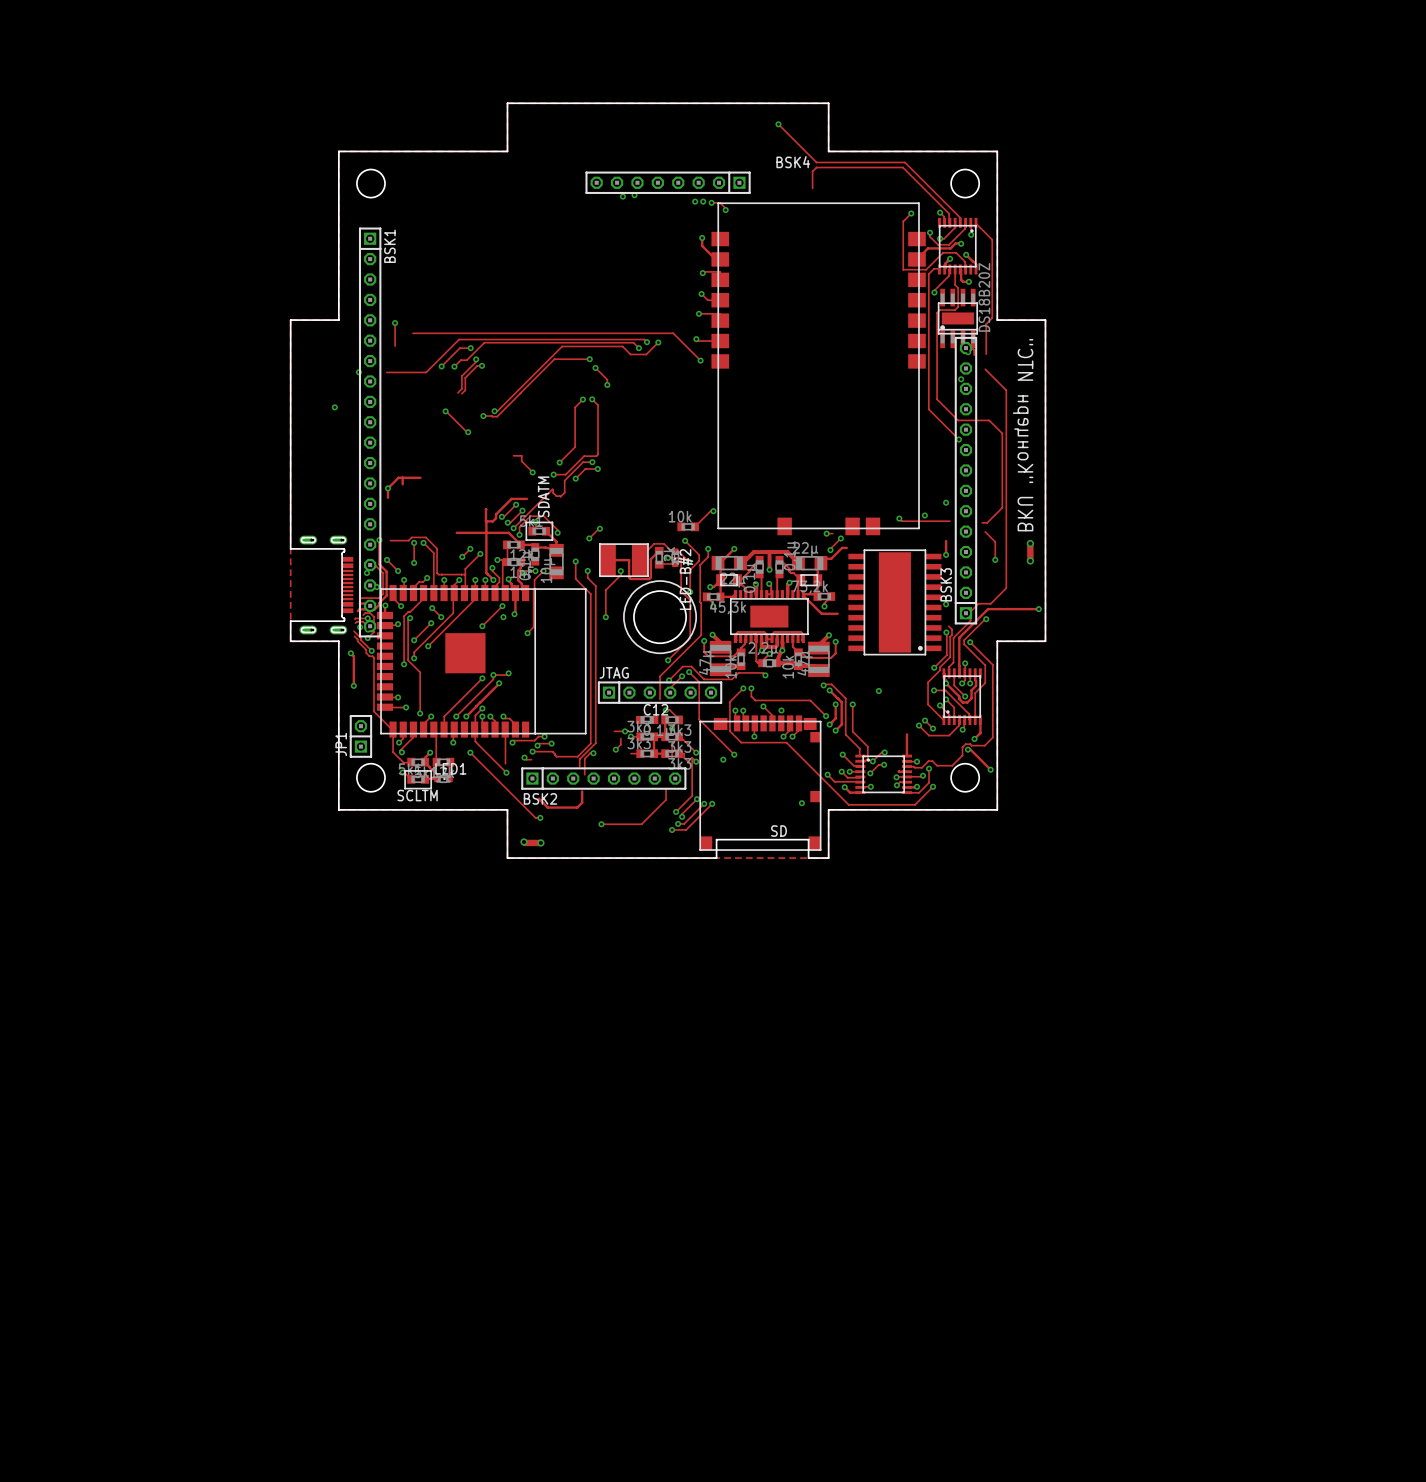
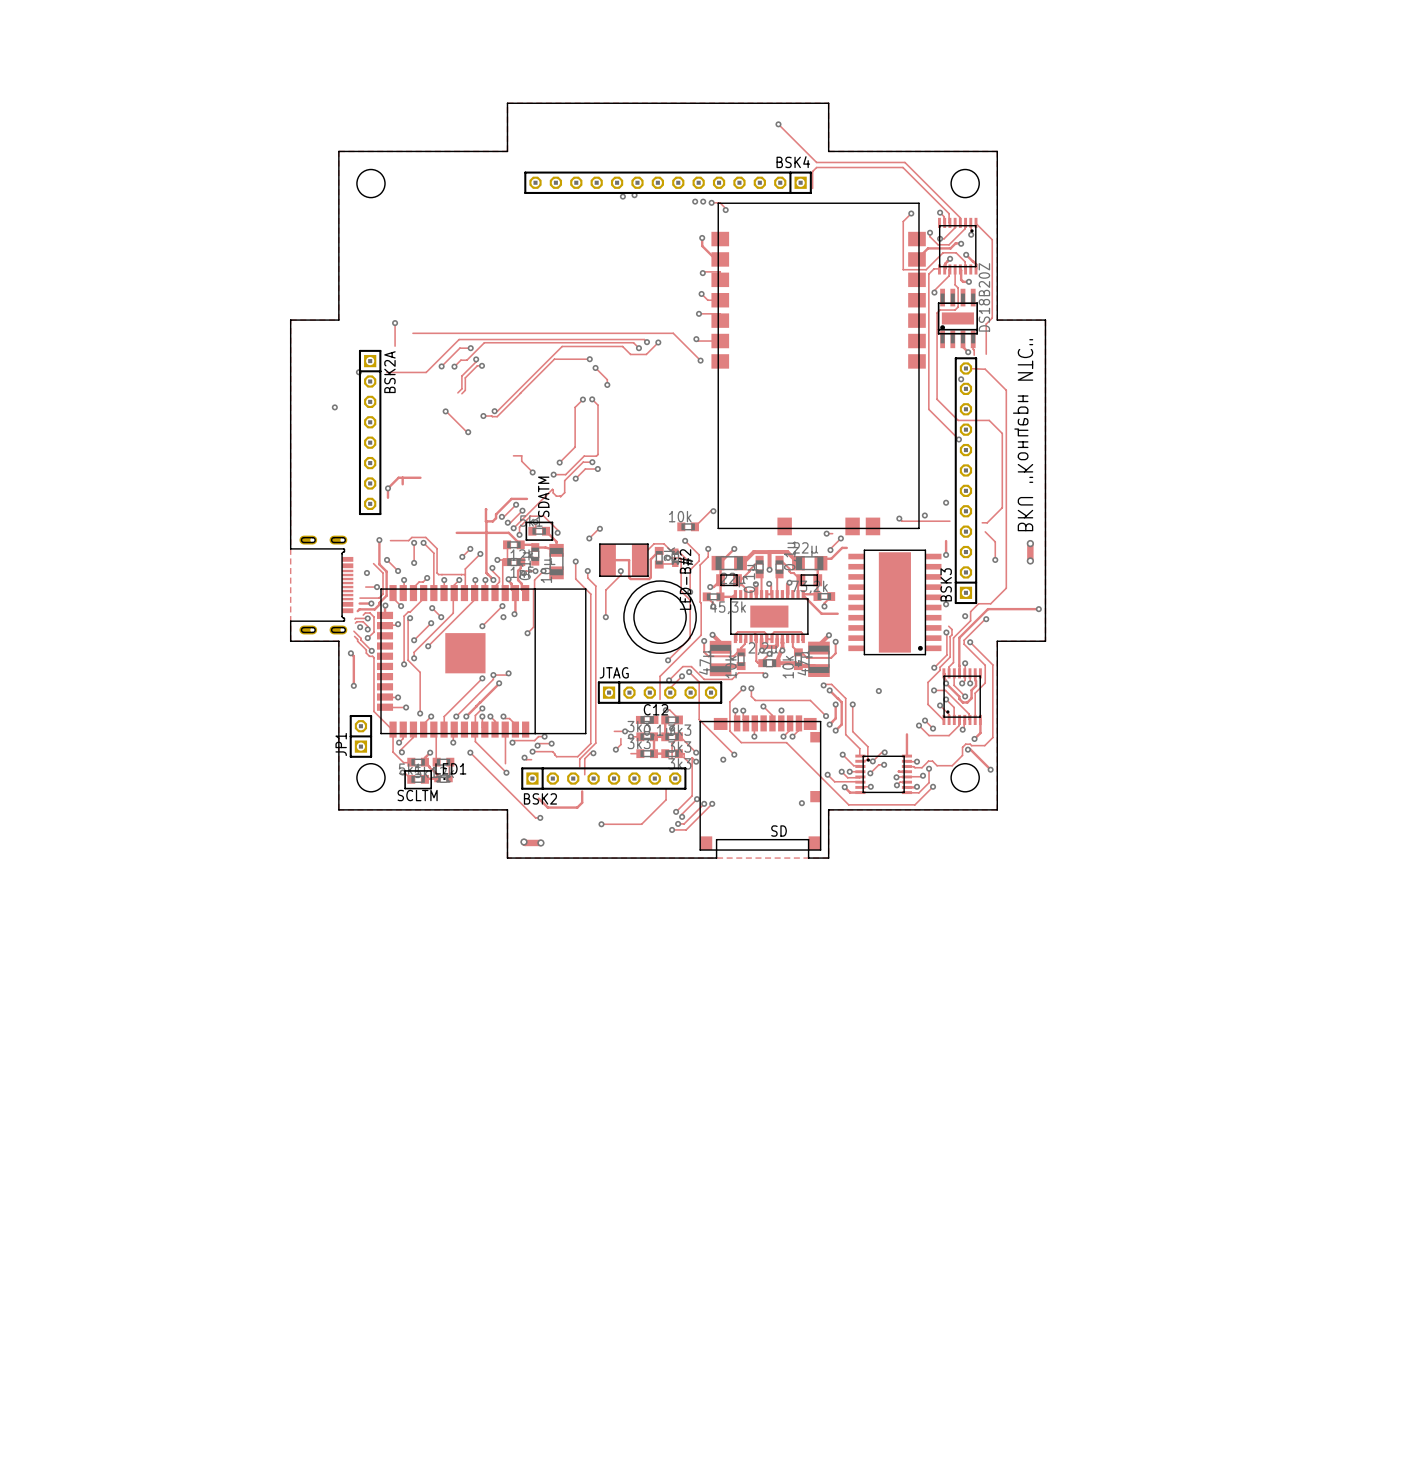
BSK4 footprint: [585, 171, 751, 194] -> [524, 171, 812, 194]
BSK3 footprint: [954, 336, 978, 625] -> [954, 357, 978, 605]
track: none -> (965, 368) (985, 369)
BSK1: (370, 432) -> none
BSK2A: none -> (370, 432)

